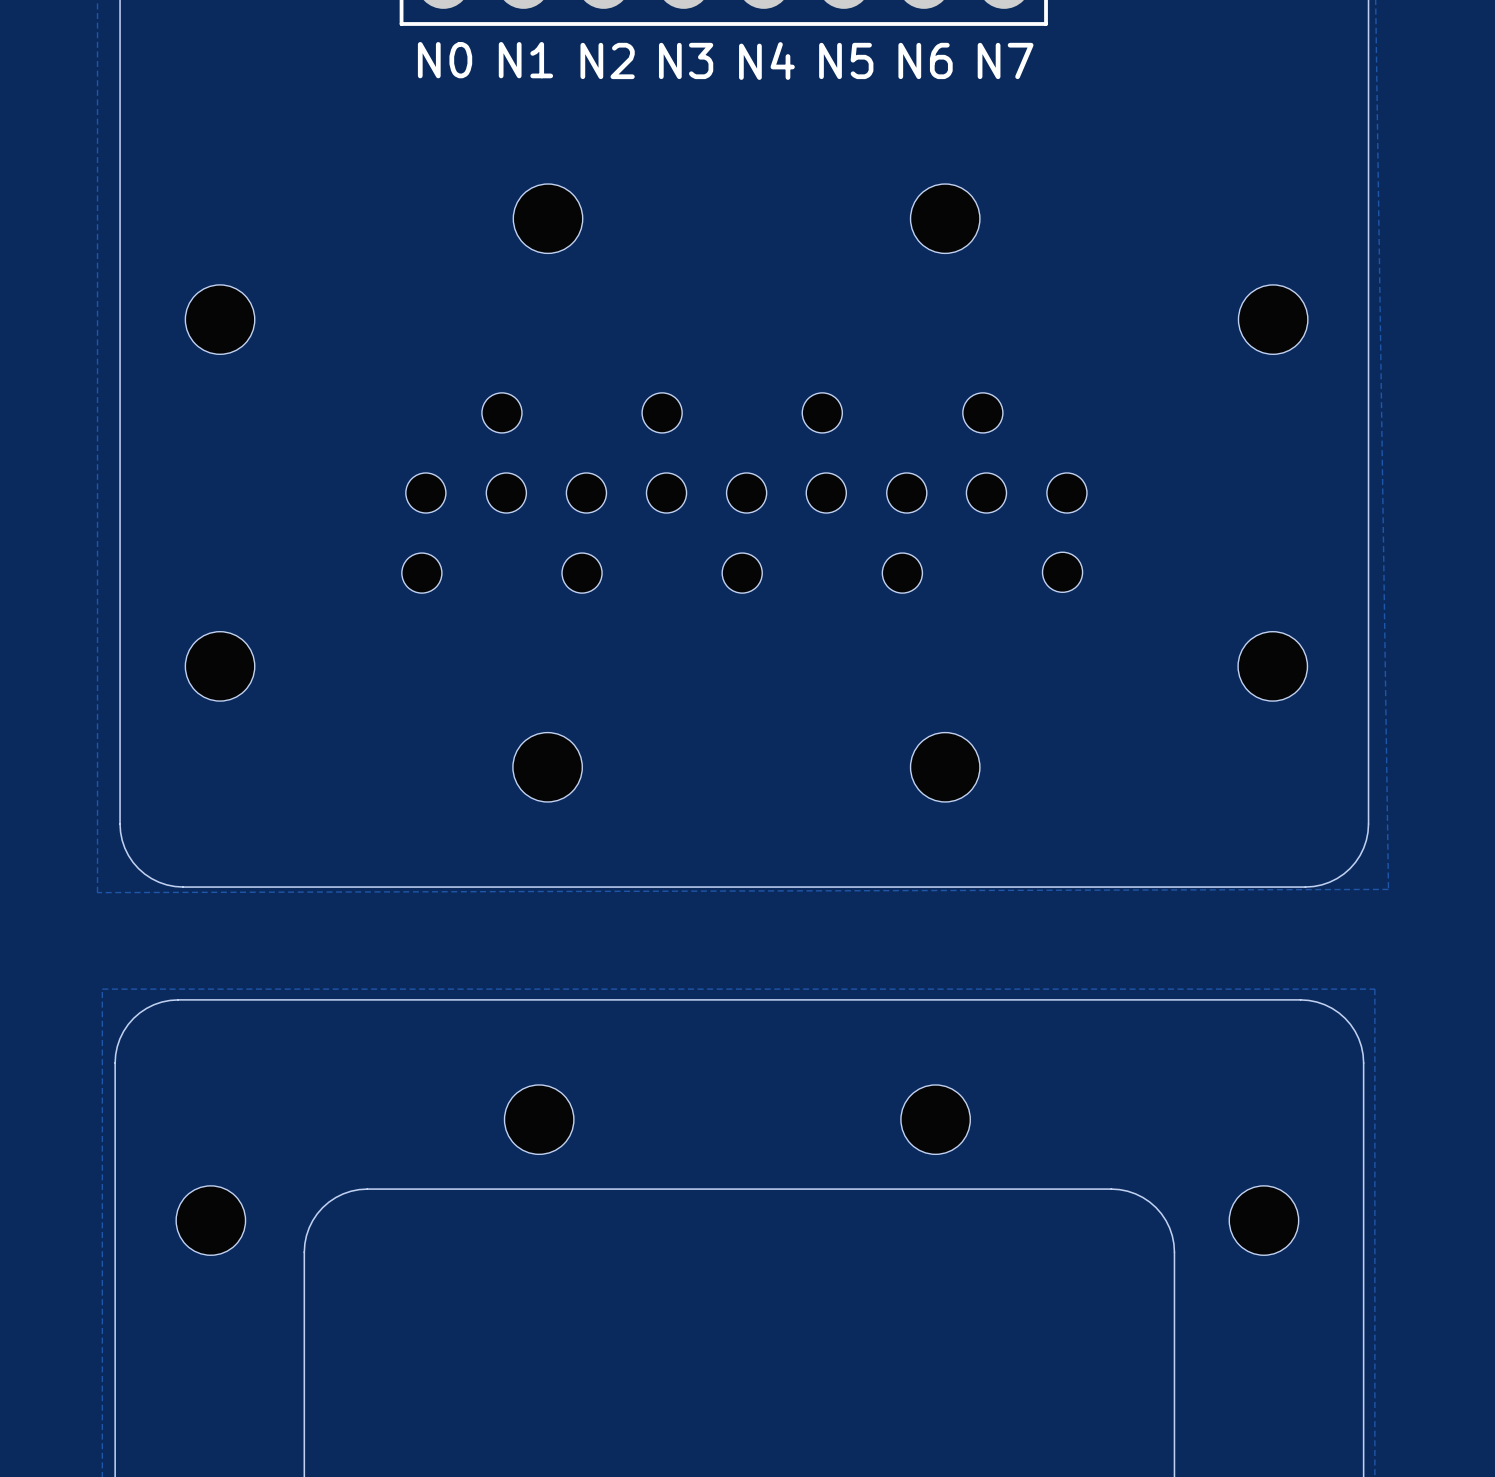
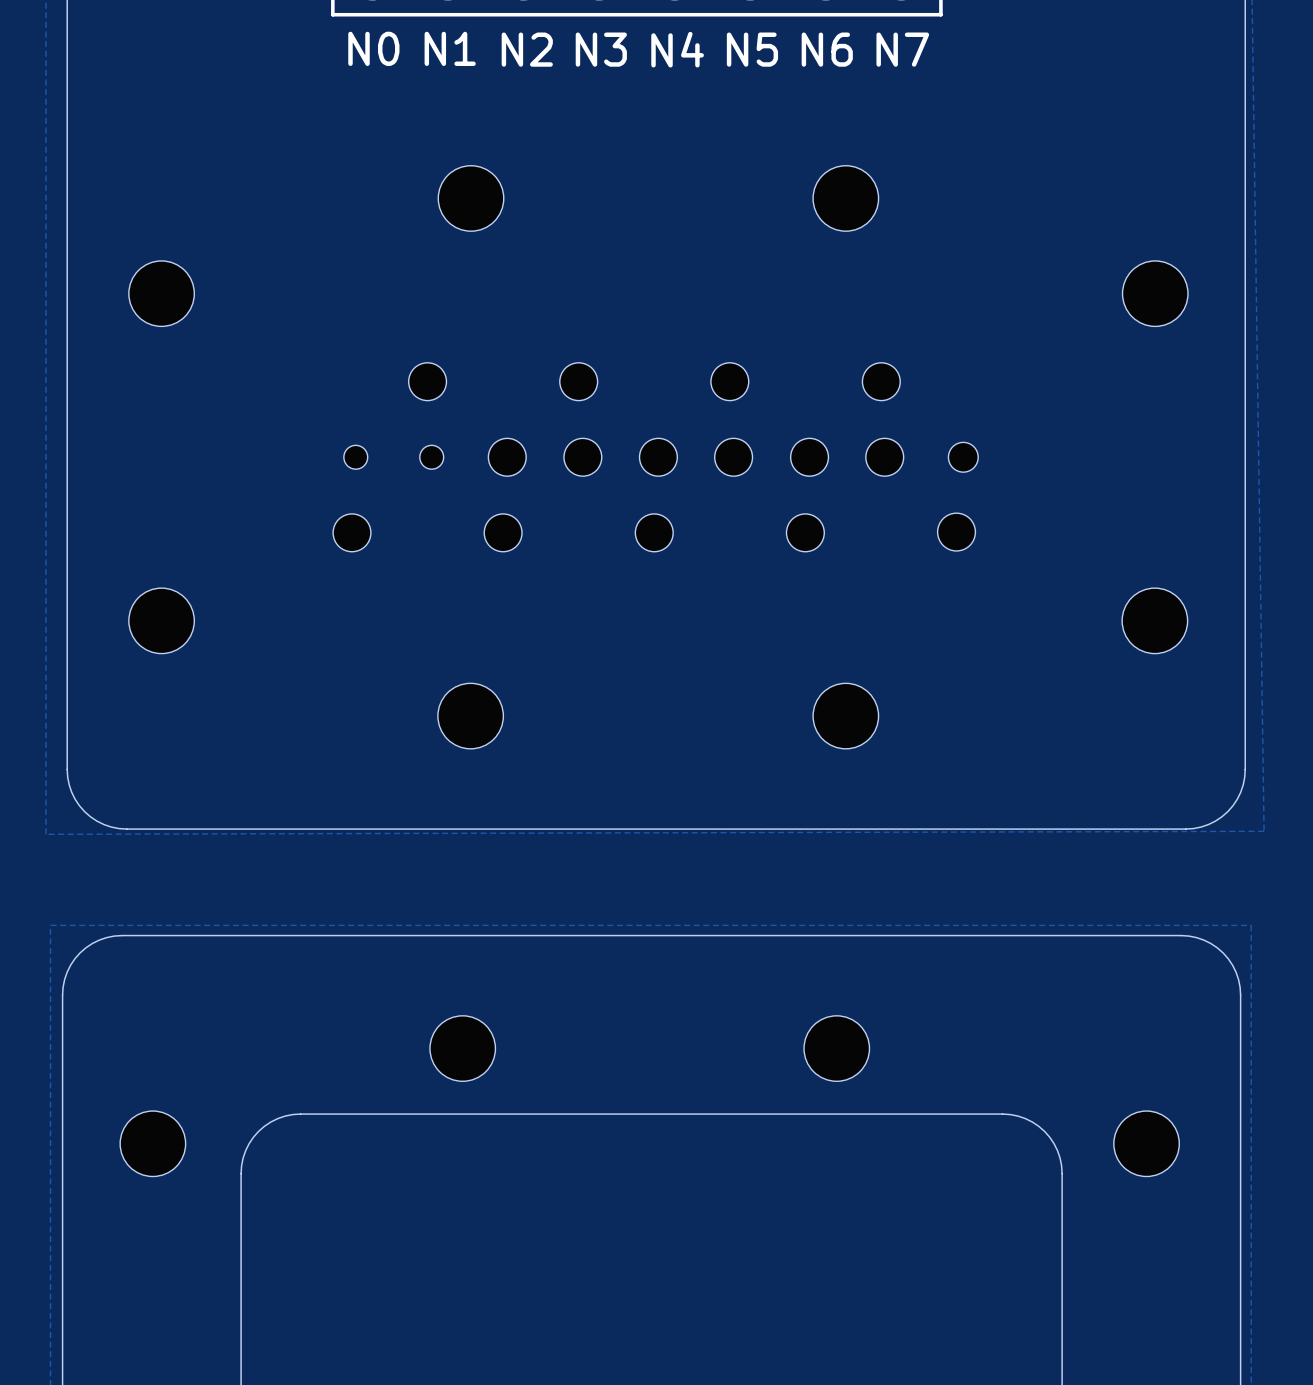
part footprint: [405, 472, 446, 514] -> [343, 445, 368, 470]
part footprint: [486, 472, 527, 514] -> [419, 445, 444, 470]
part footprint: [1046, 472, 1087, 514] -> [948, 442, 979, 473]

